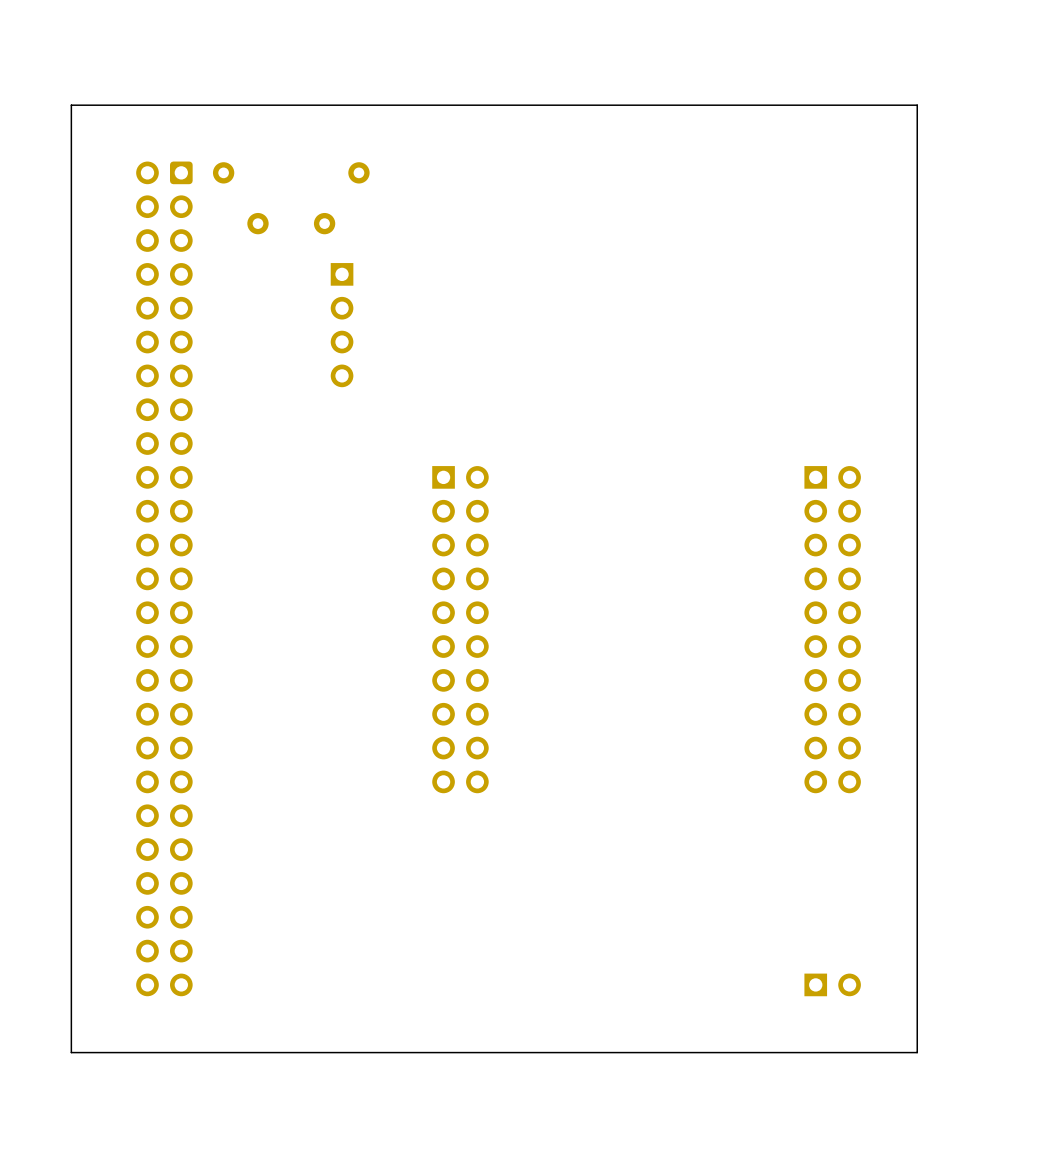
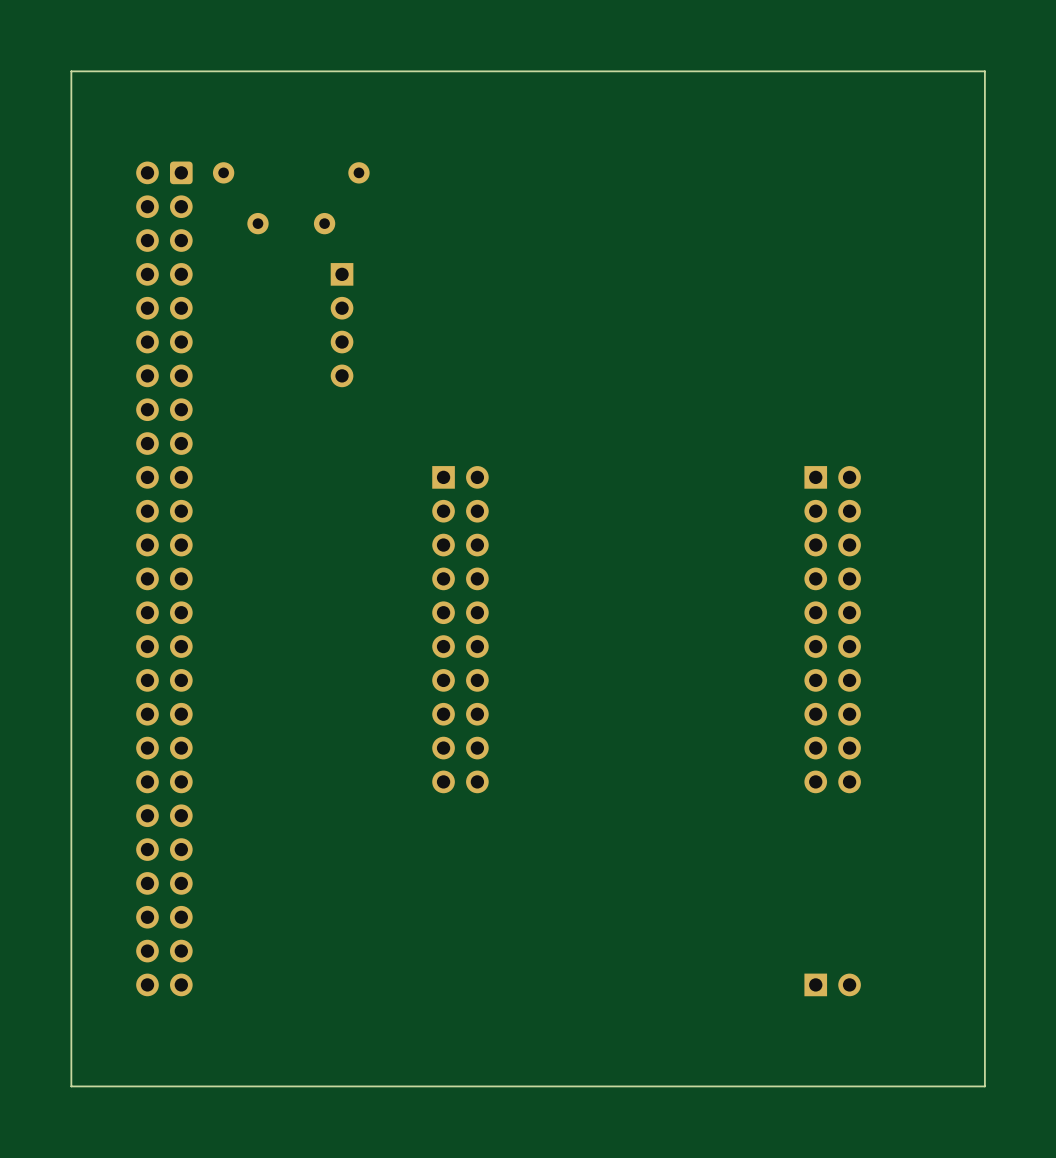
board edge: (71, 105) (917, 105) (917, 1052) (71, 1052) -> (71, 105) (71, 71) (984, 71) (984, 1086) (71, 1086) (71, 1052)

